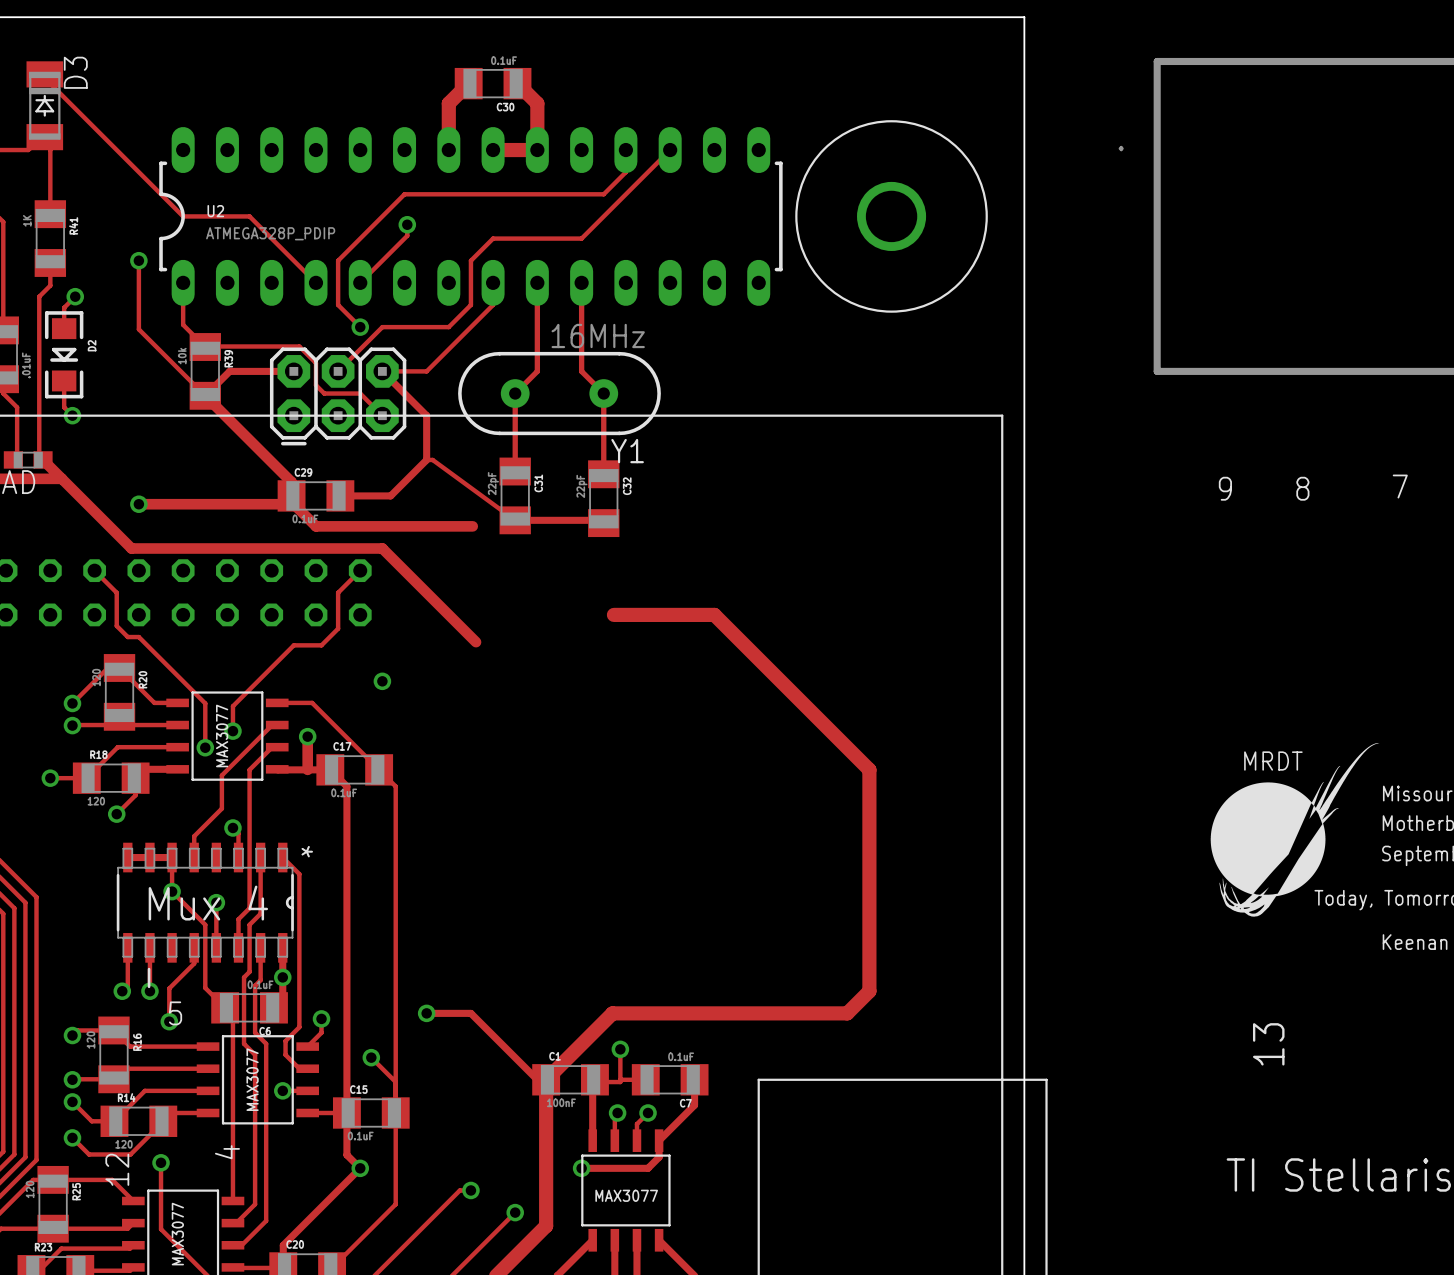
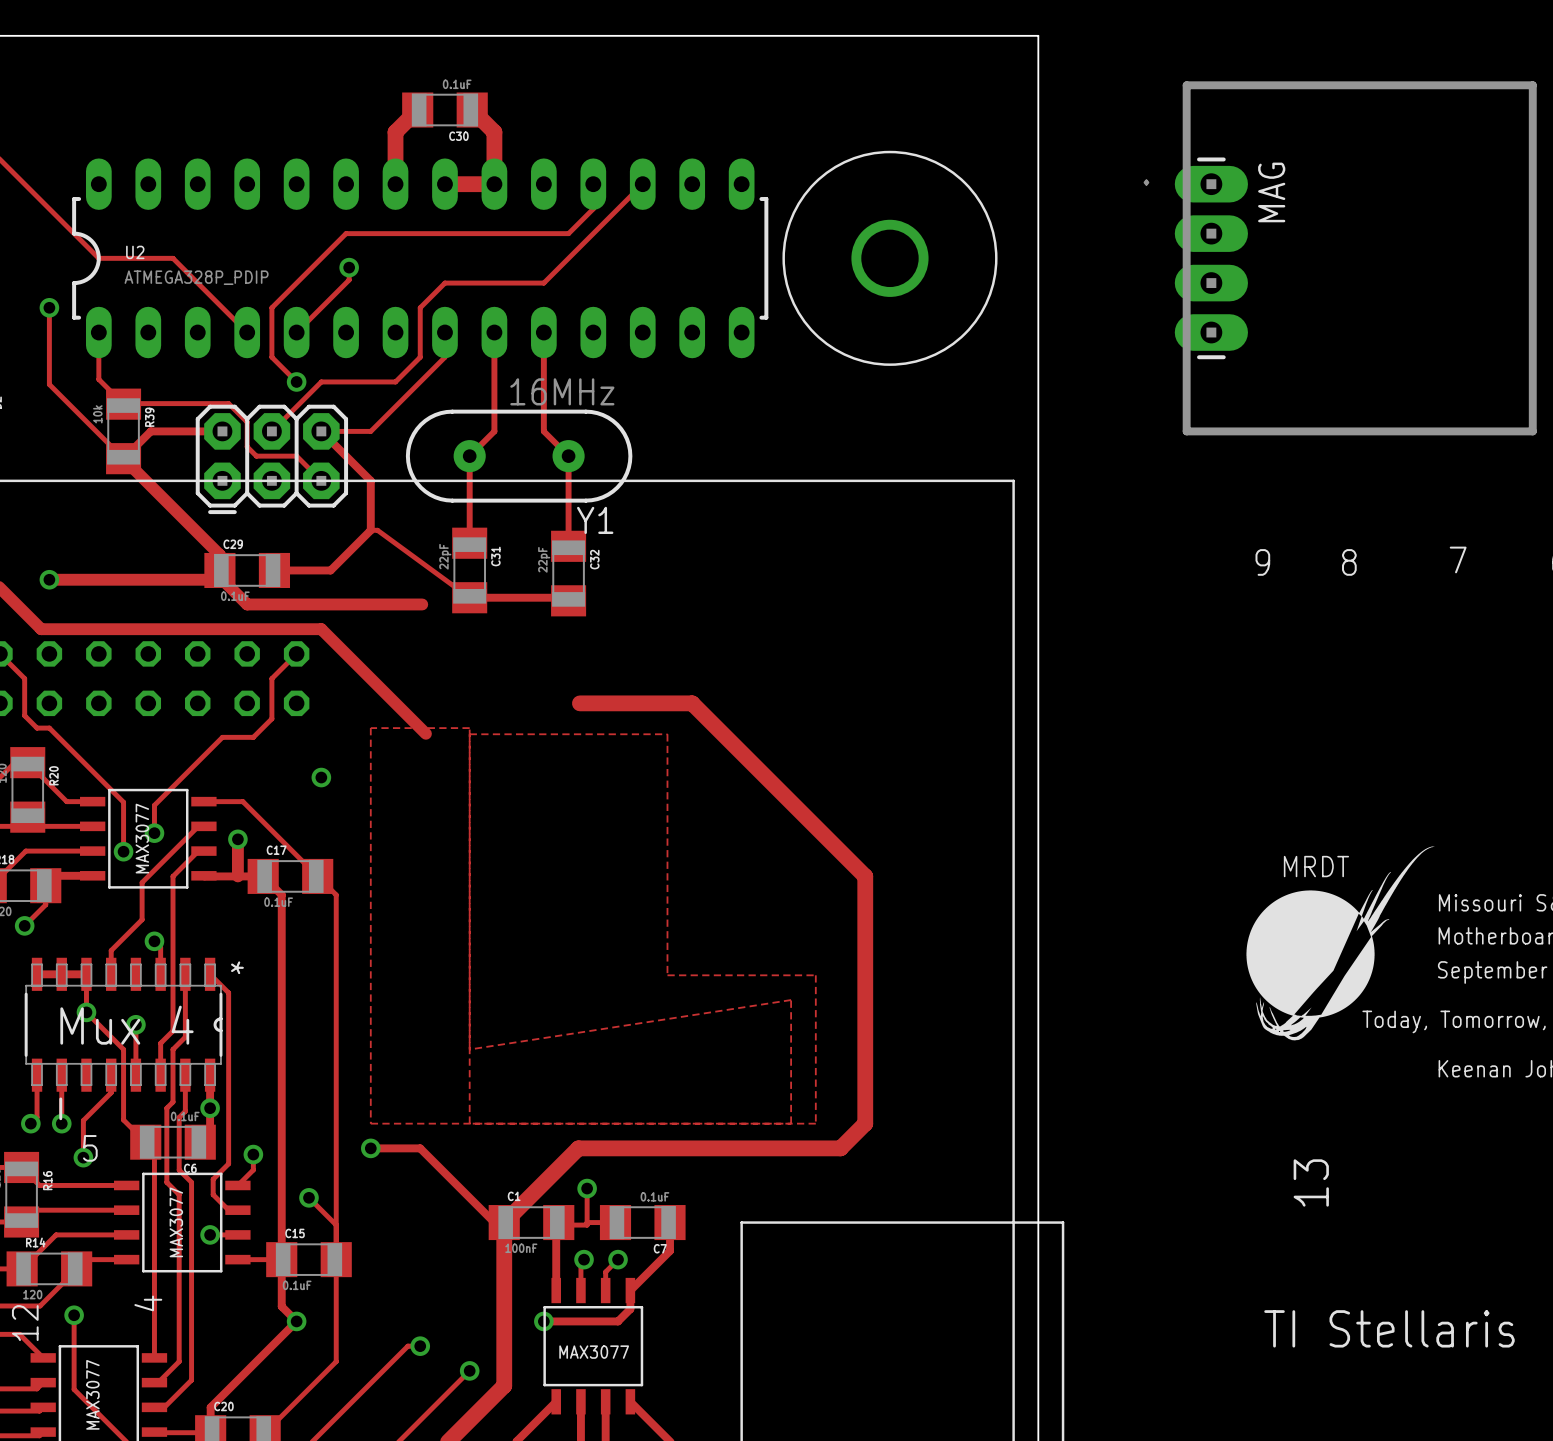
MAG: none -> (1211, 258)
zone outline: none -> (469, 734) (667, 734) (667, 975) (815, 975) (815, 1123) (370, 1123) (370, 728) (469, 728) (469, 1123)
zone outline: none -> (469, 1049) (791, 1000) (791, 1123)

